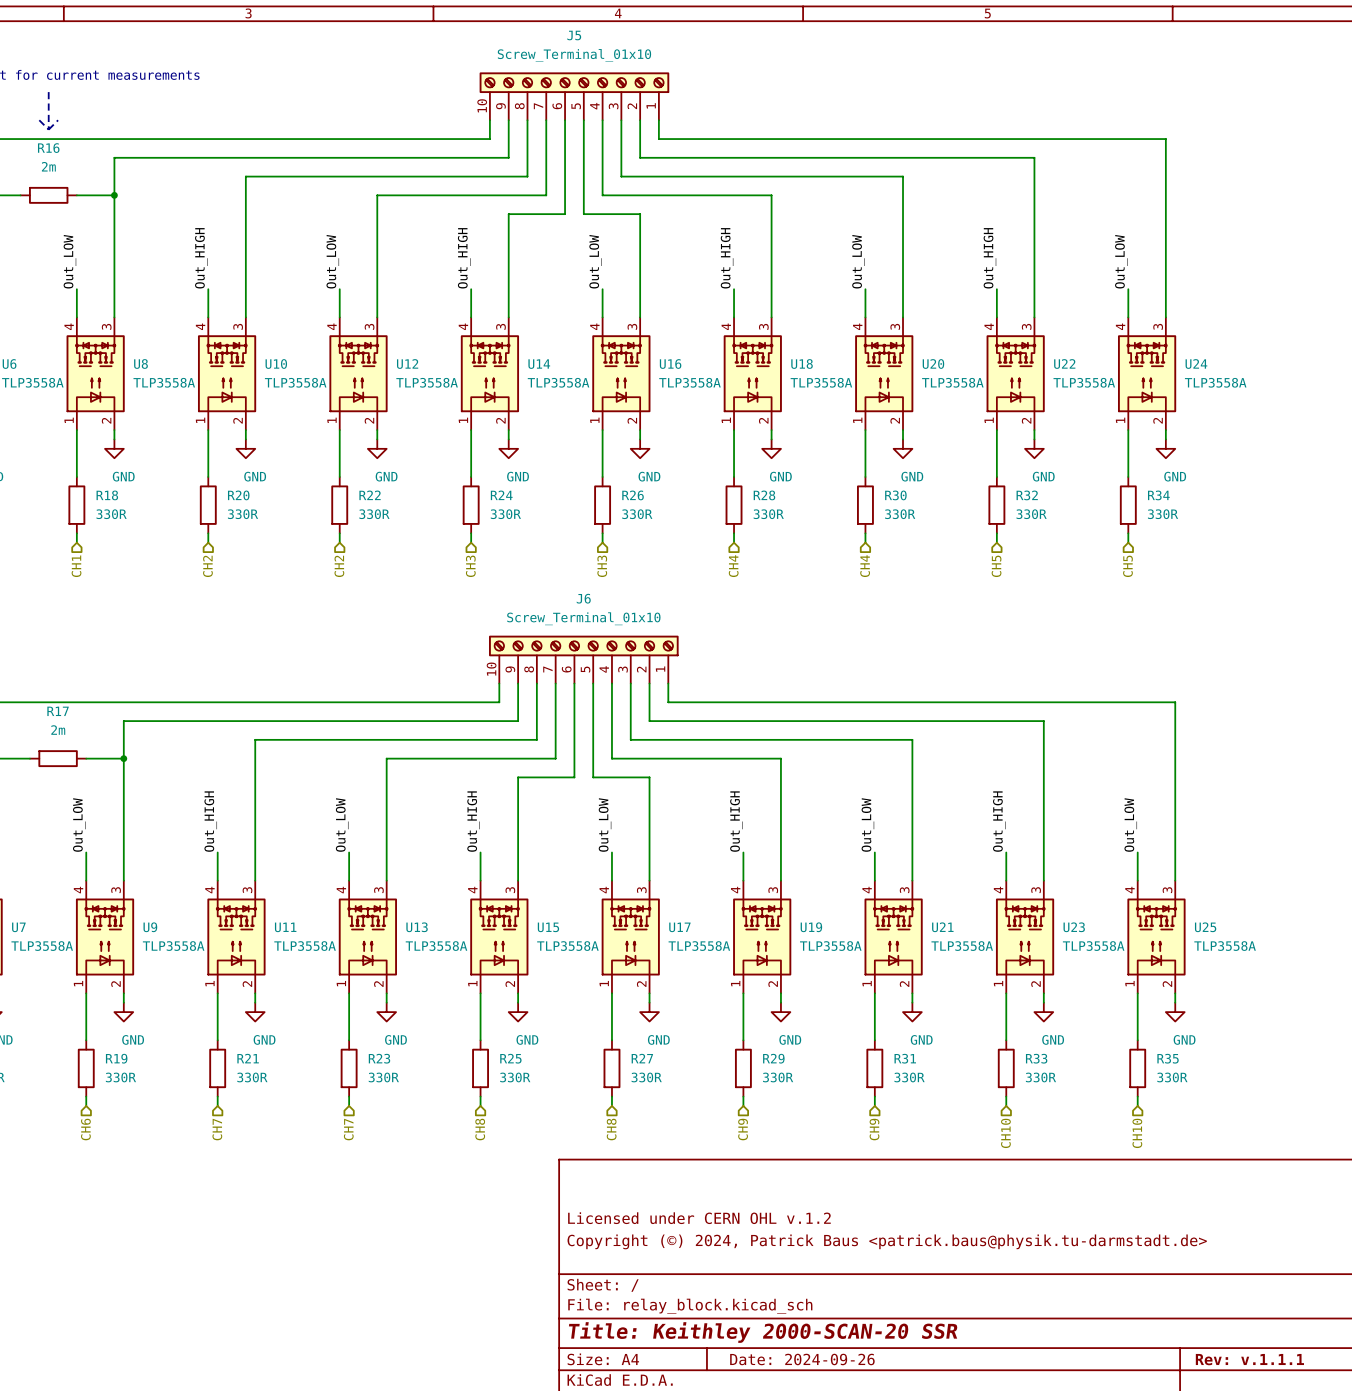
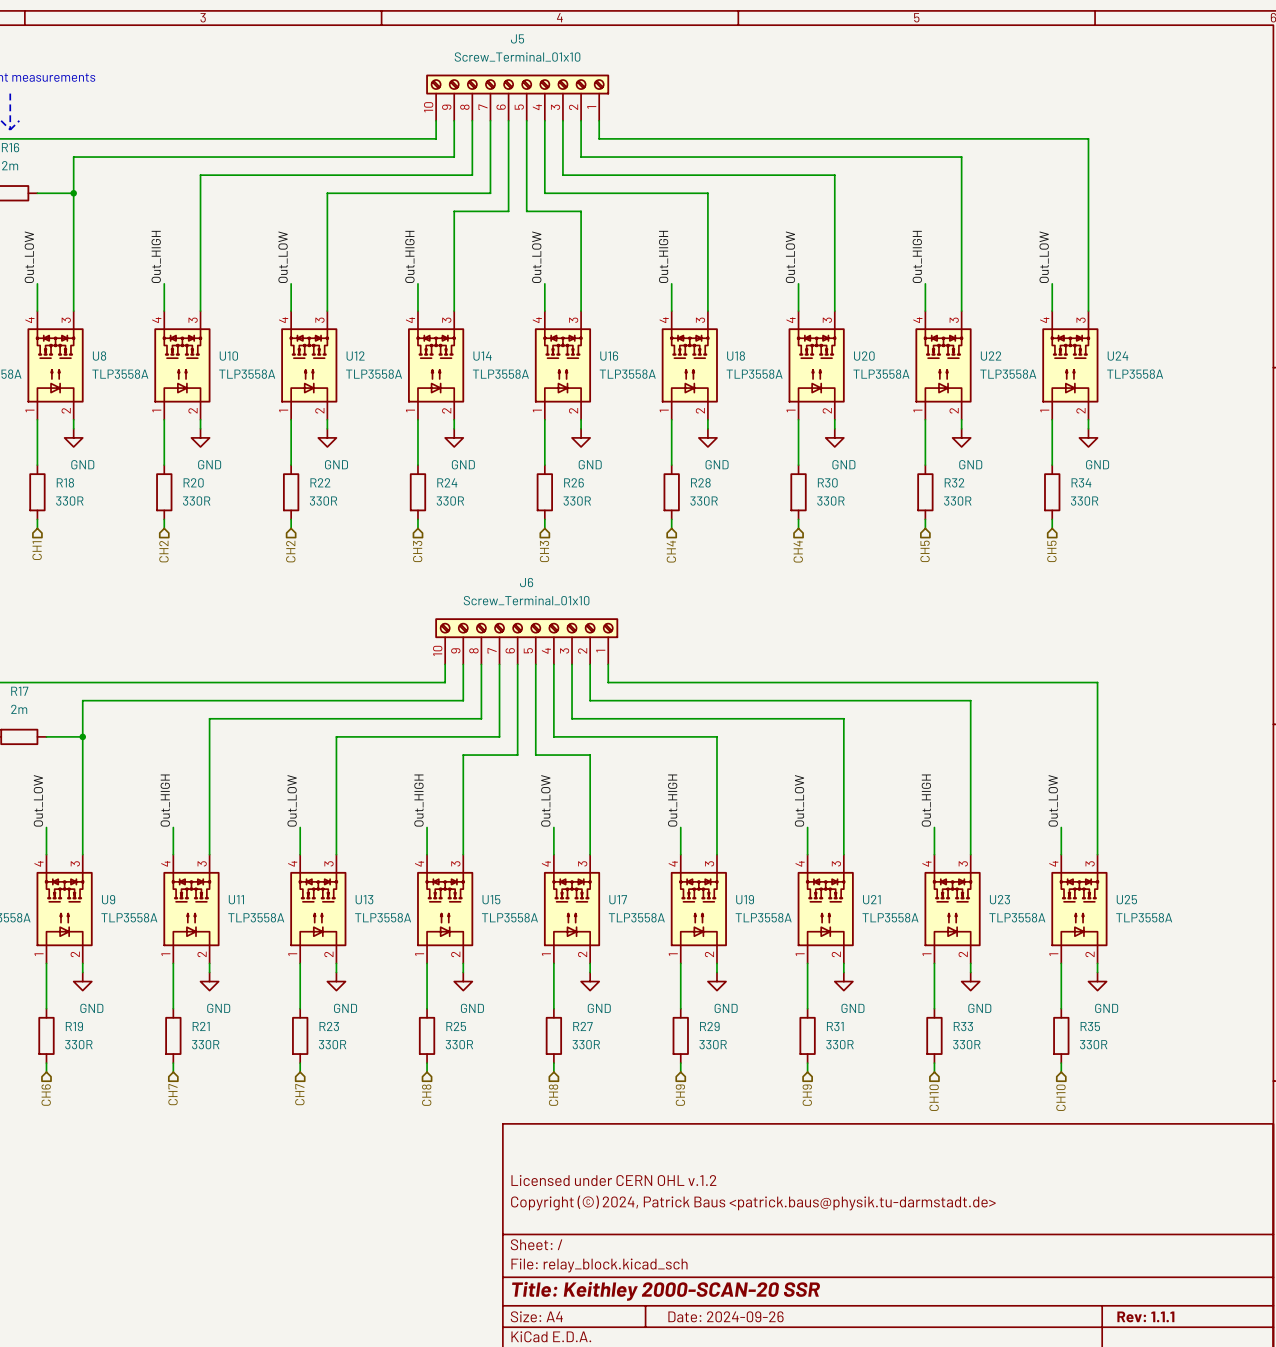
title block: Rev: v.1.1.1 (1249, 1359) -> Rev: 1.1.1 (1145, 1316)

